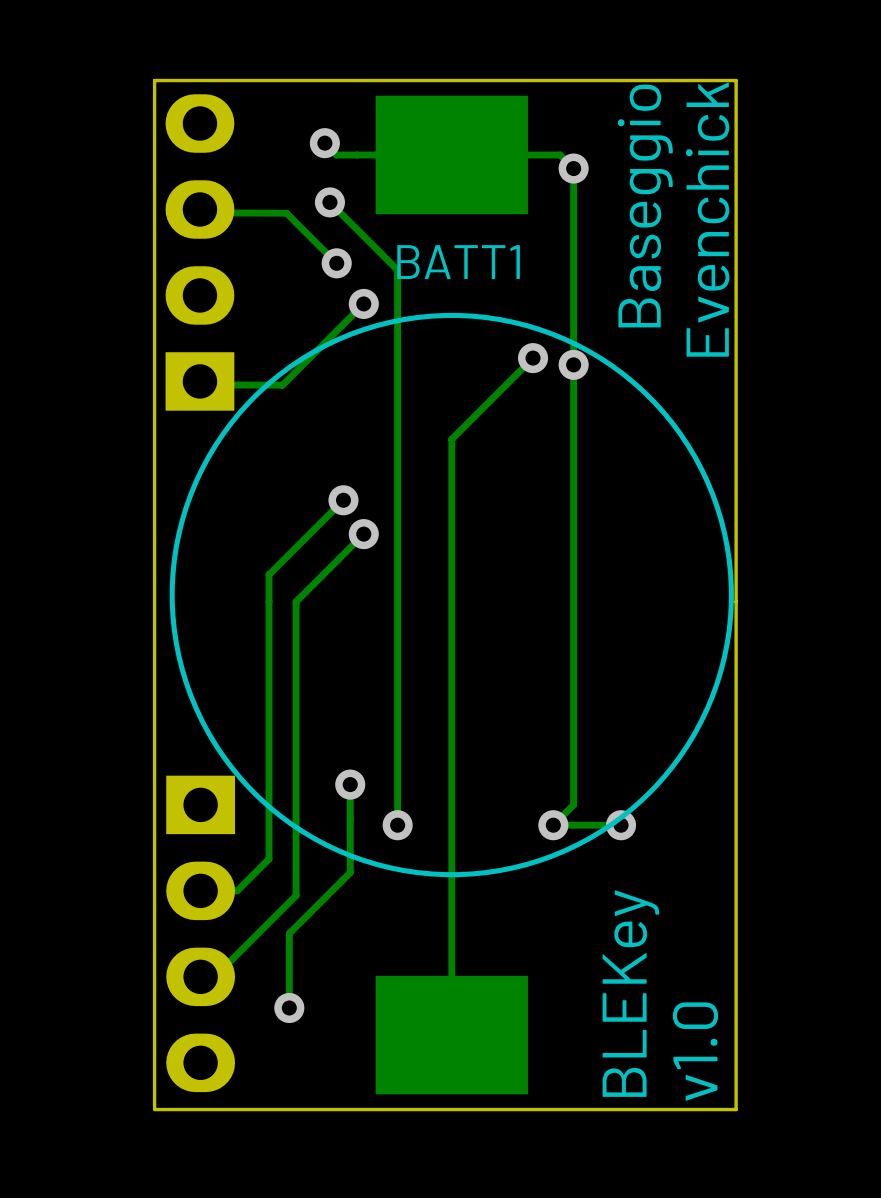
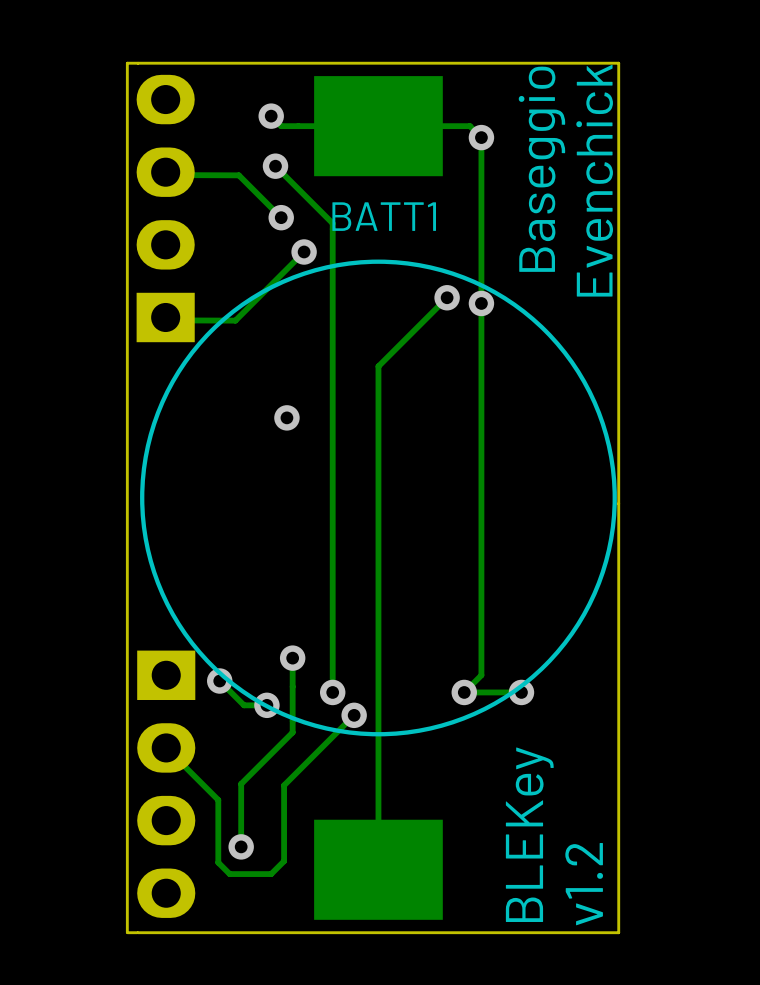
track: (343, 500) (269, 574) (269, 859) (237, 890) (214, 890) -> none
track: (363, 534) (296, 601) (296, 895) (214, 976) -> none
via: (363, 534) -> none
track: none -> (219, 681) (244, 705) (266, 705)
via: none -> (219, 681)
via: none -> (266, 705)
track: none -> (354, 715) (284, 785) (284, 861) (271, 874) (229, 874) (218, 862) (218, 799) (166, 747)
via: none -> (354, 715)
text: v1.0 (695, 1051) -> v1.2 (584, 884)

